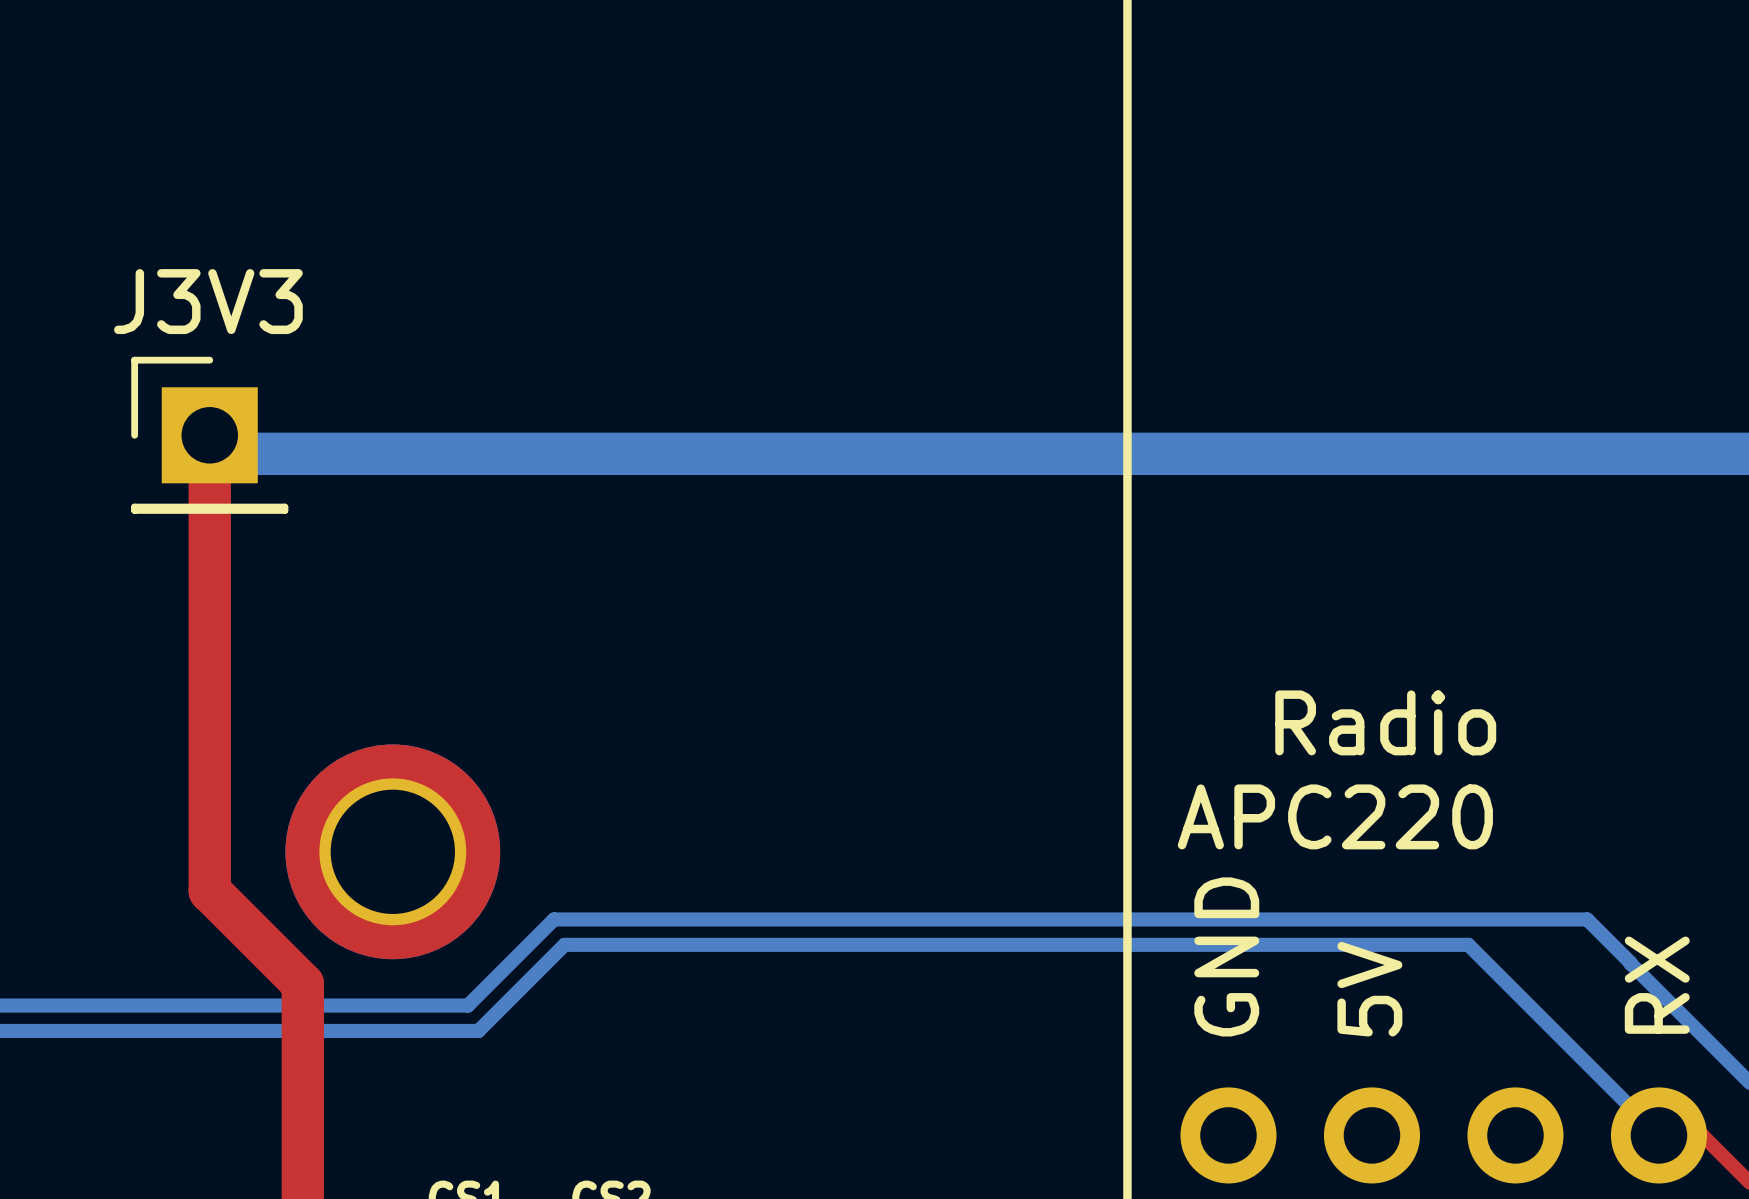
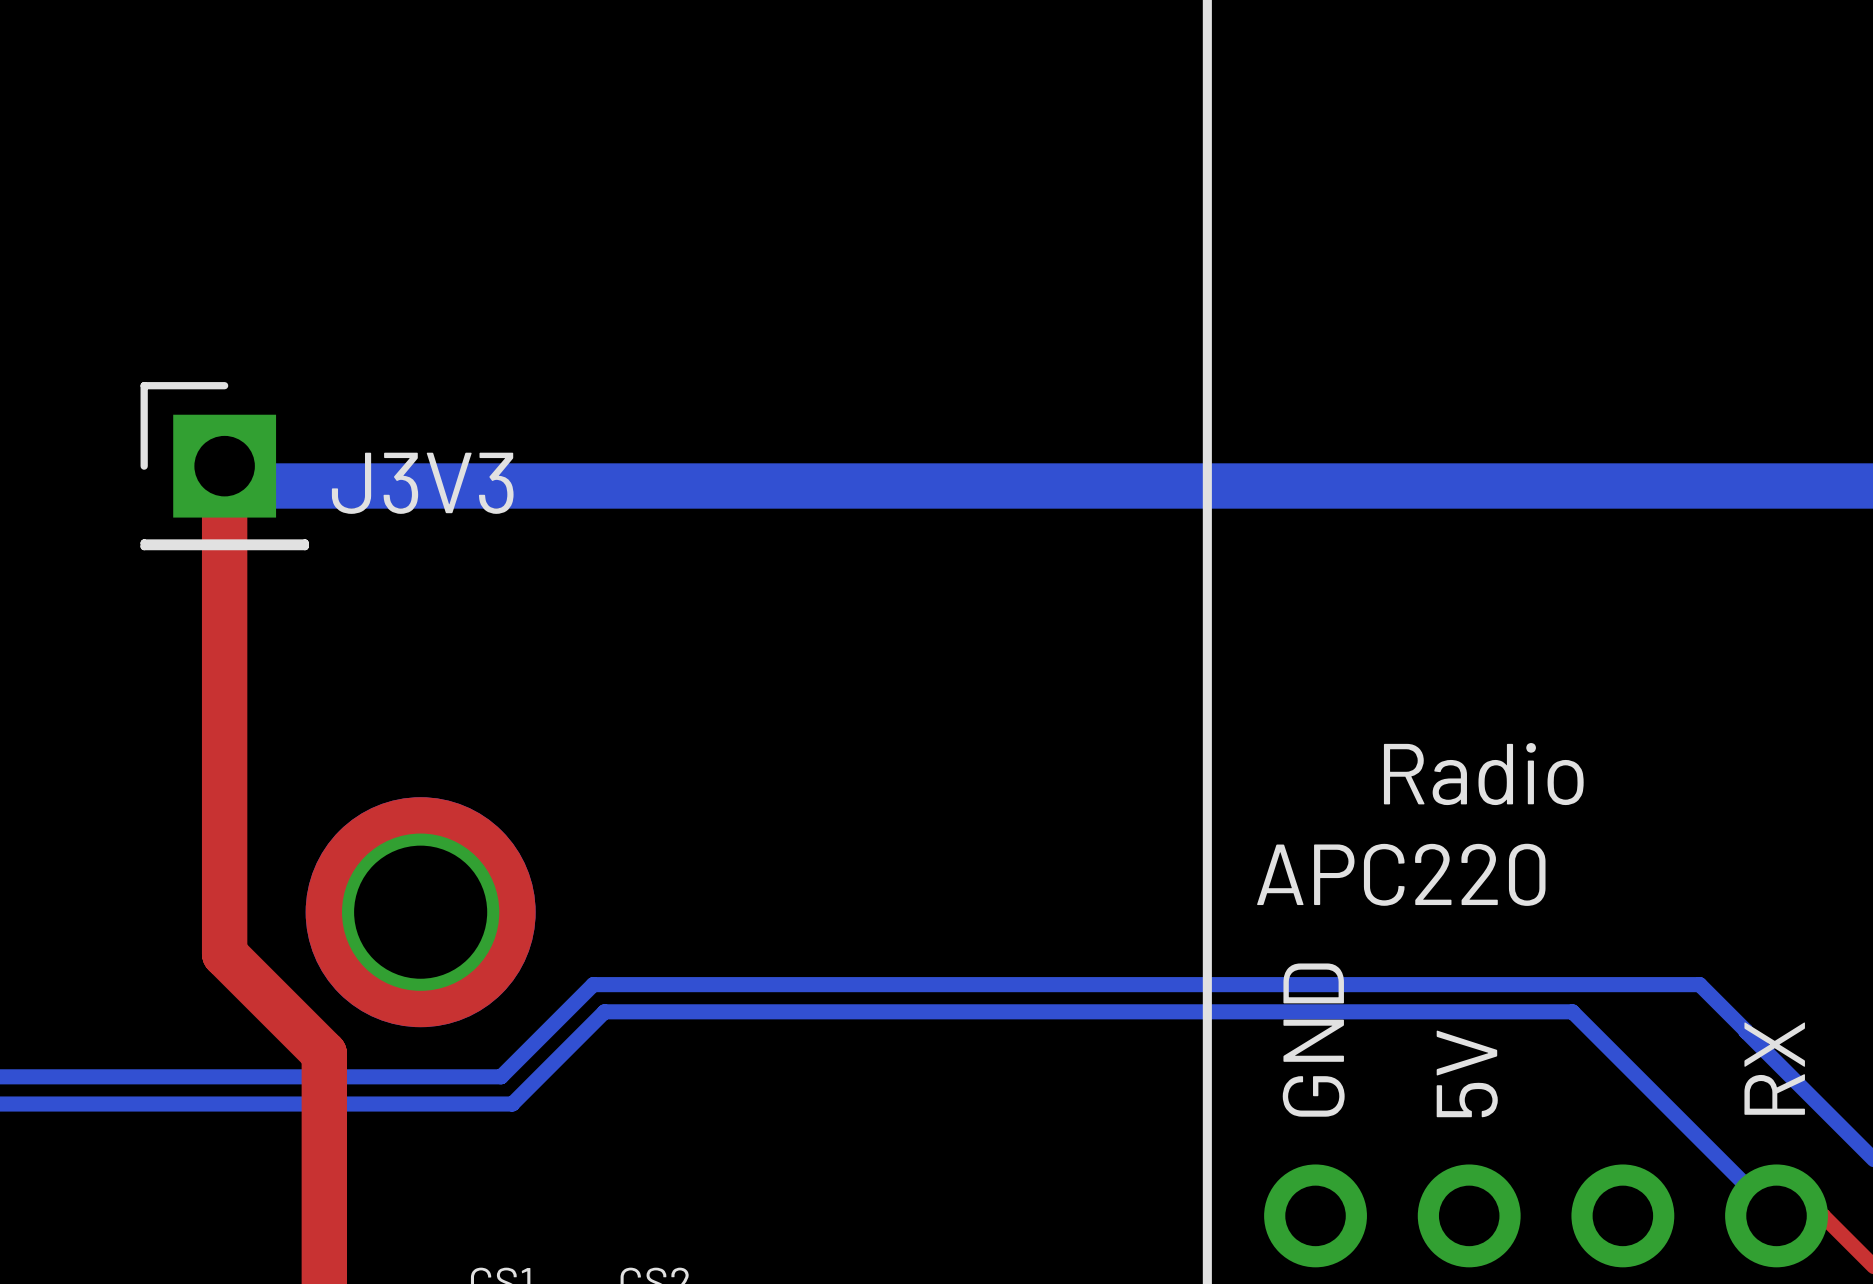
J3V3 name position: J3V3 (208, 301) -> J3V3 (422, 483)

